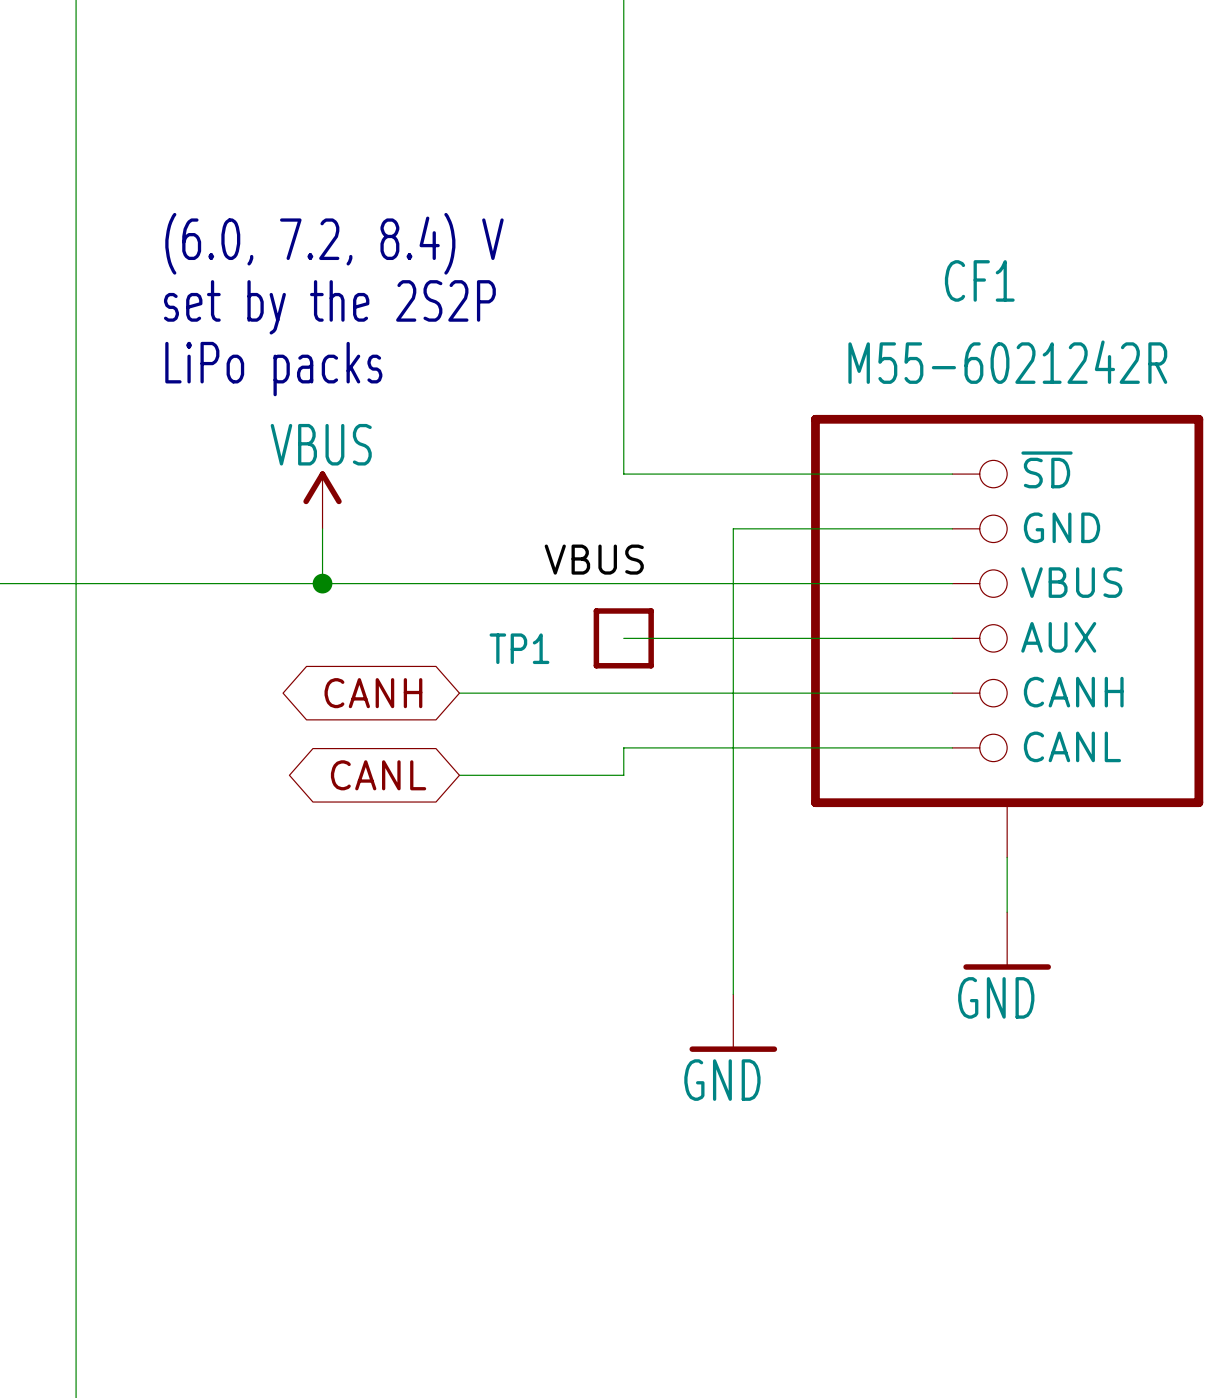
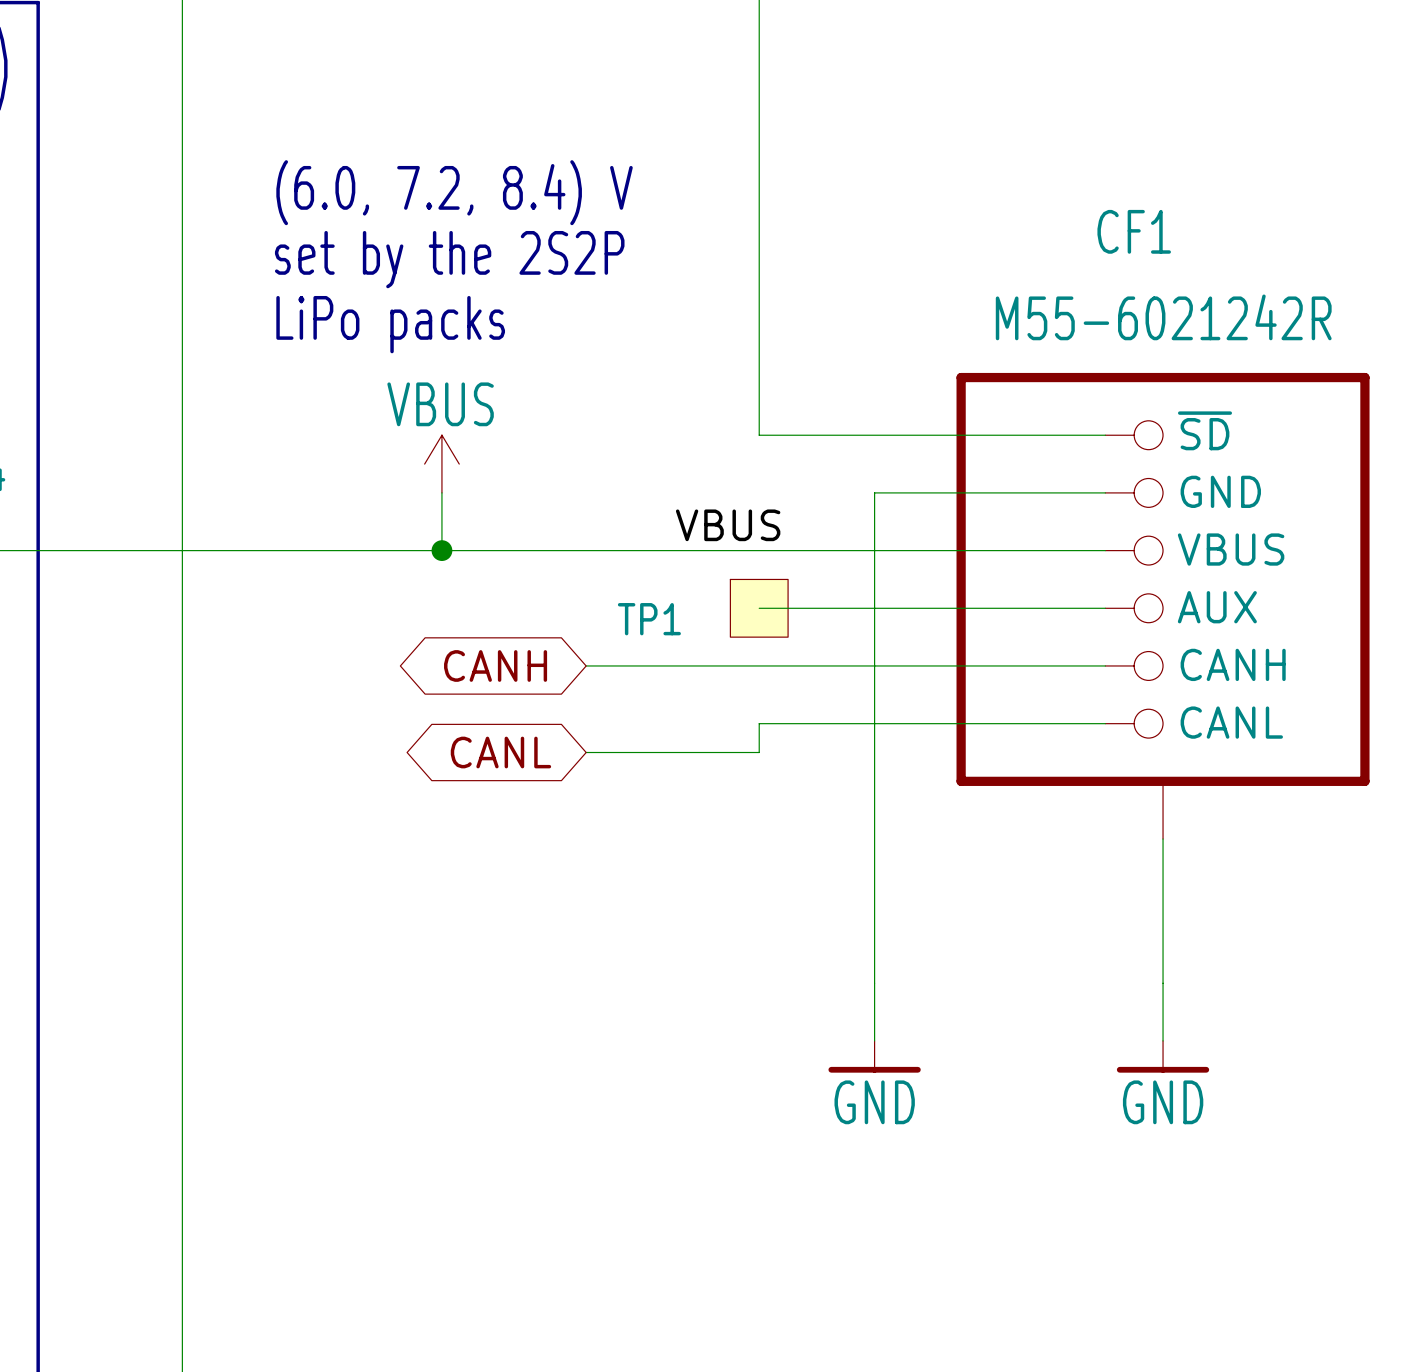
power symbol shape: [303, 471, 342, 529] -> [424, 435, 460, 493]
TP1 symbol: [593, 608, 654, 669] -> [730, 579, 789, 638]
wire: none -> (1163, 896) (1163, 1040)
power symbol: GND (1007, 940) -> none
power symbol: GND (733, 1023) -> none
power symbol: none -> GND (874, 1056)
power symbol: none -> GND (1163, 1056)

